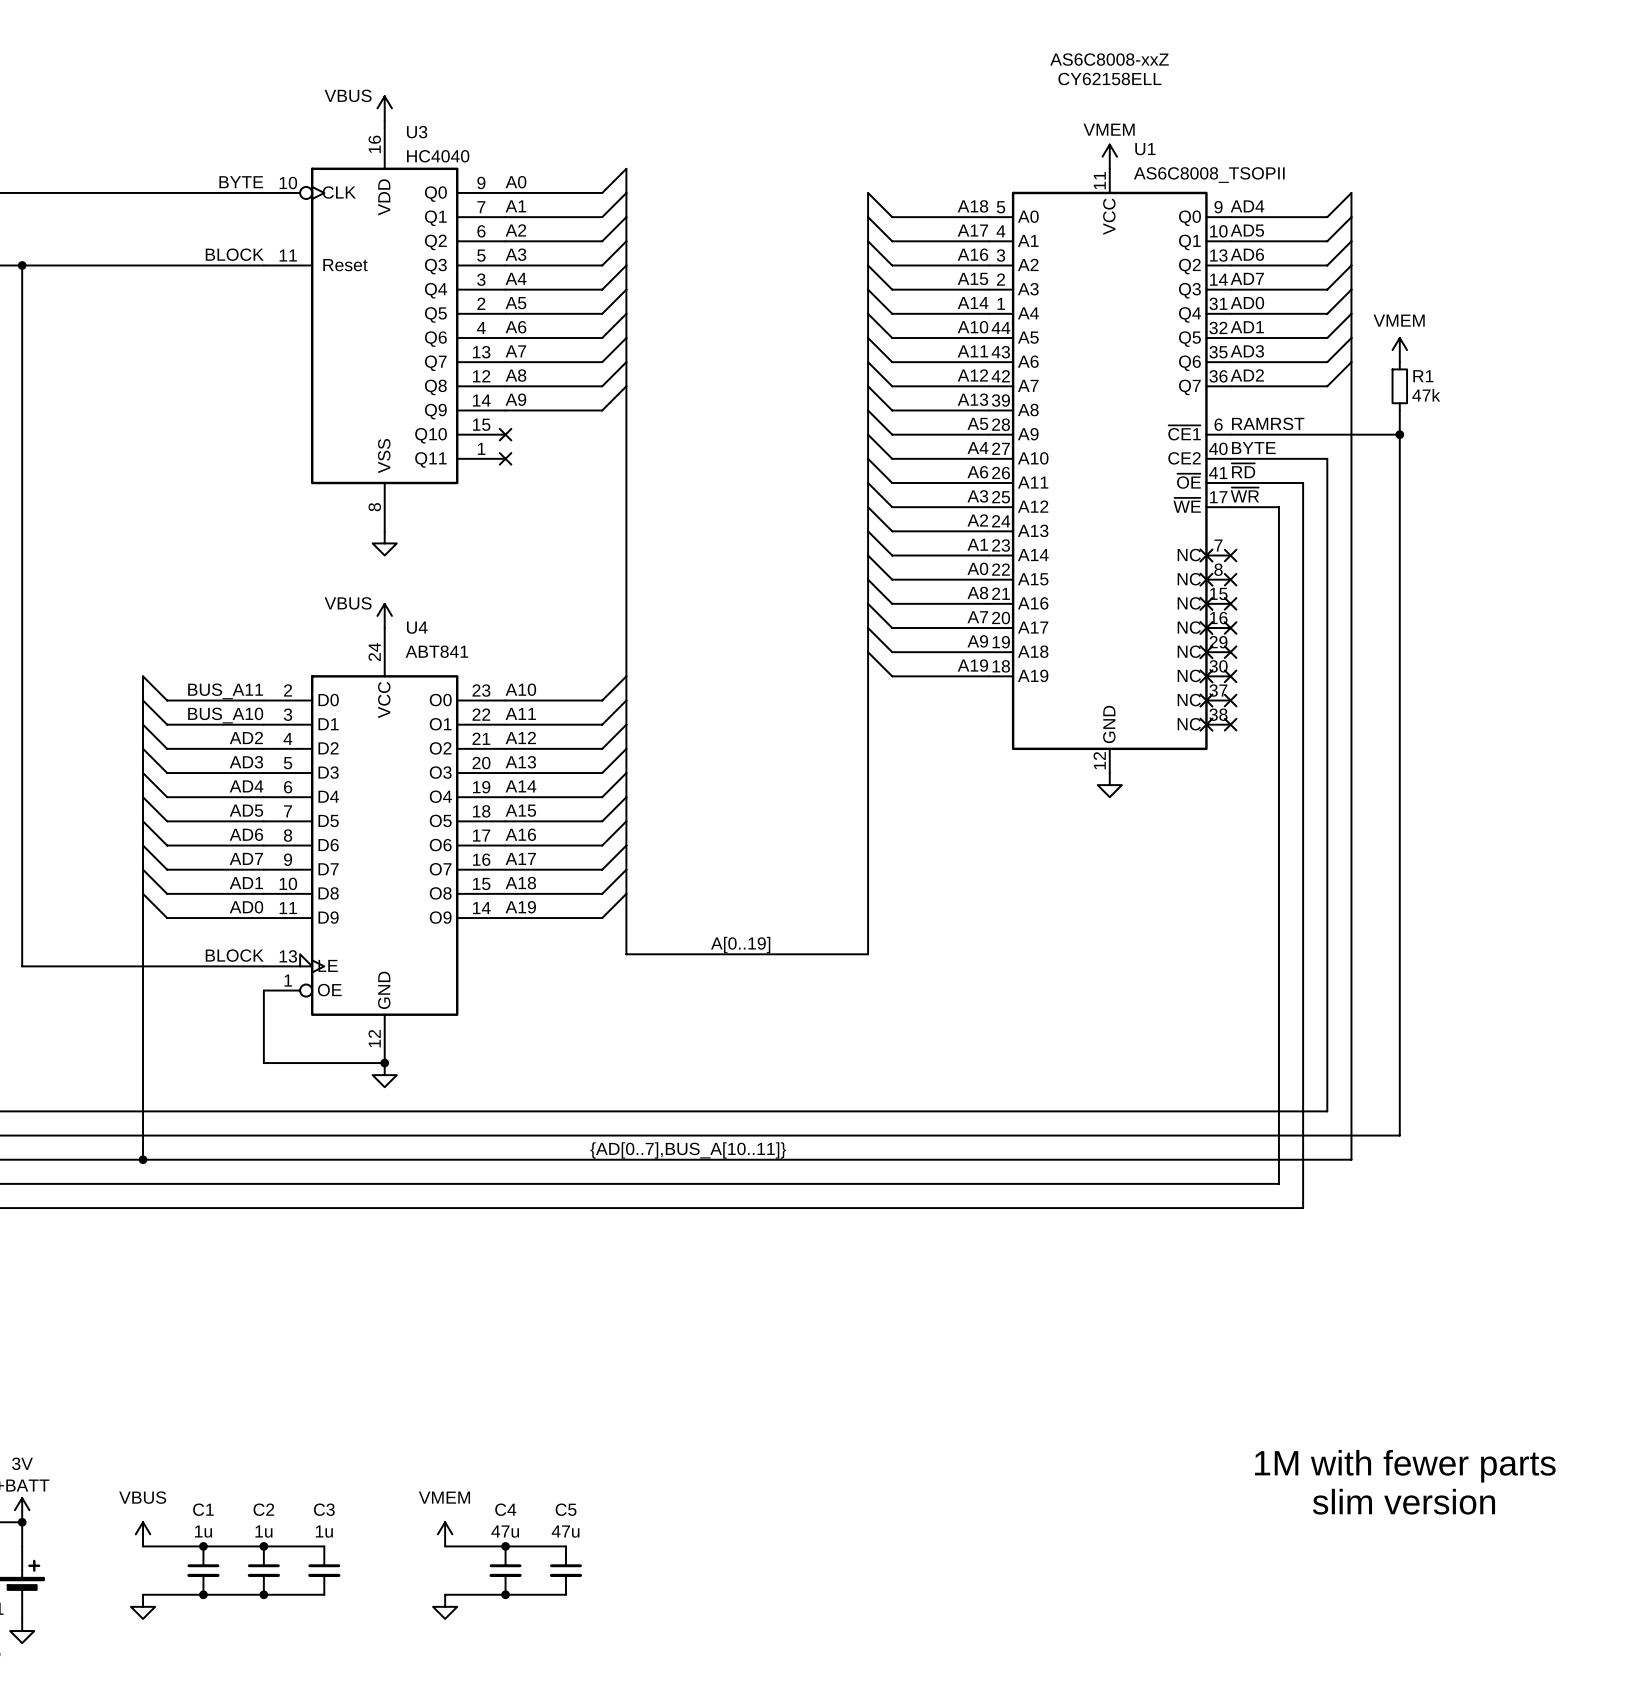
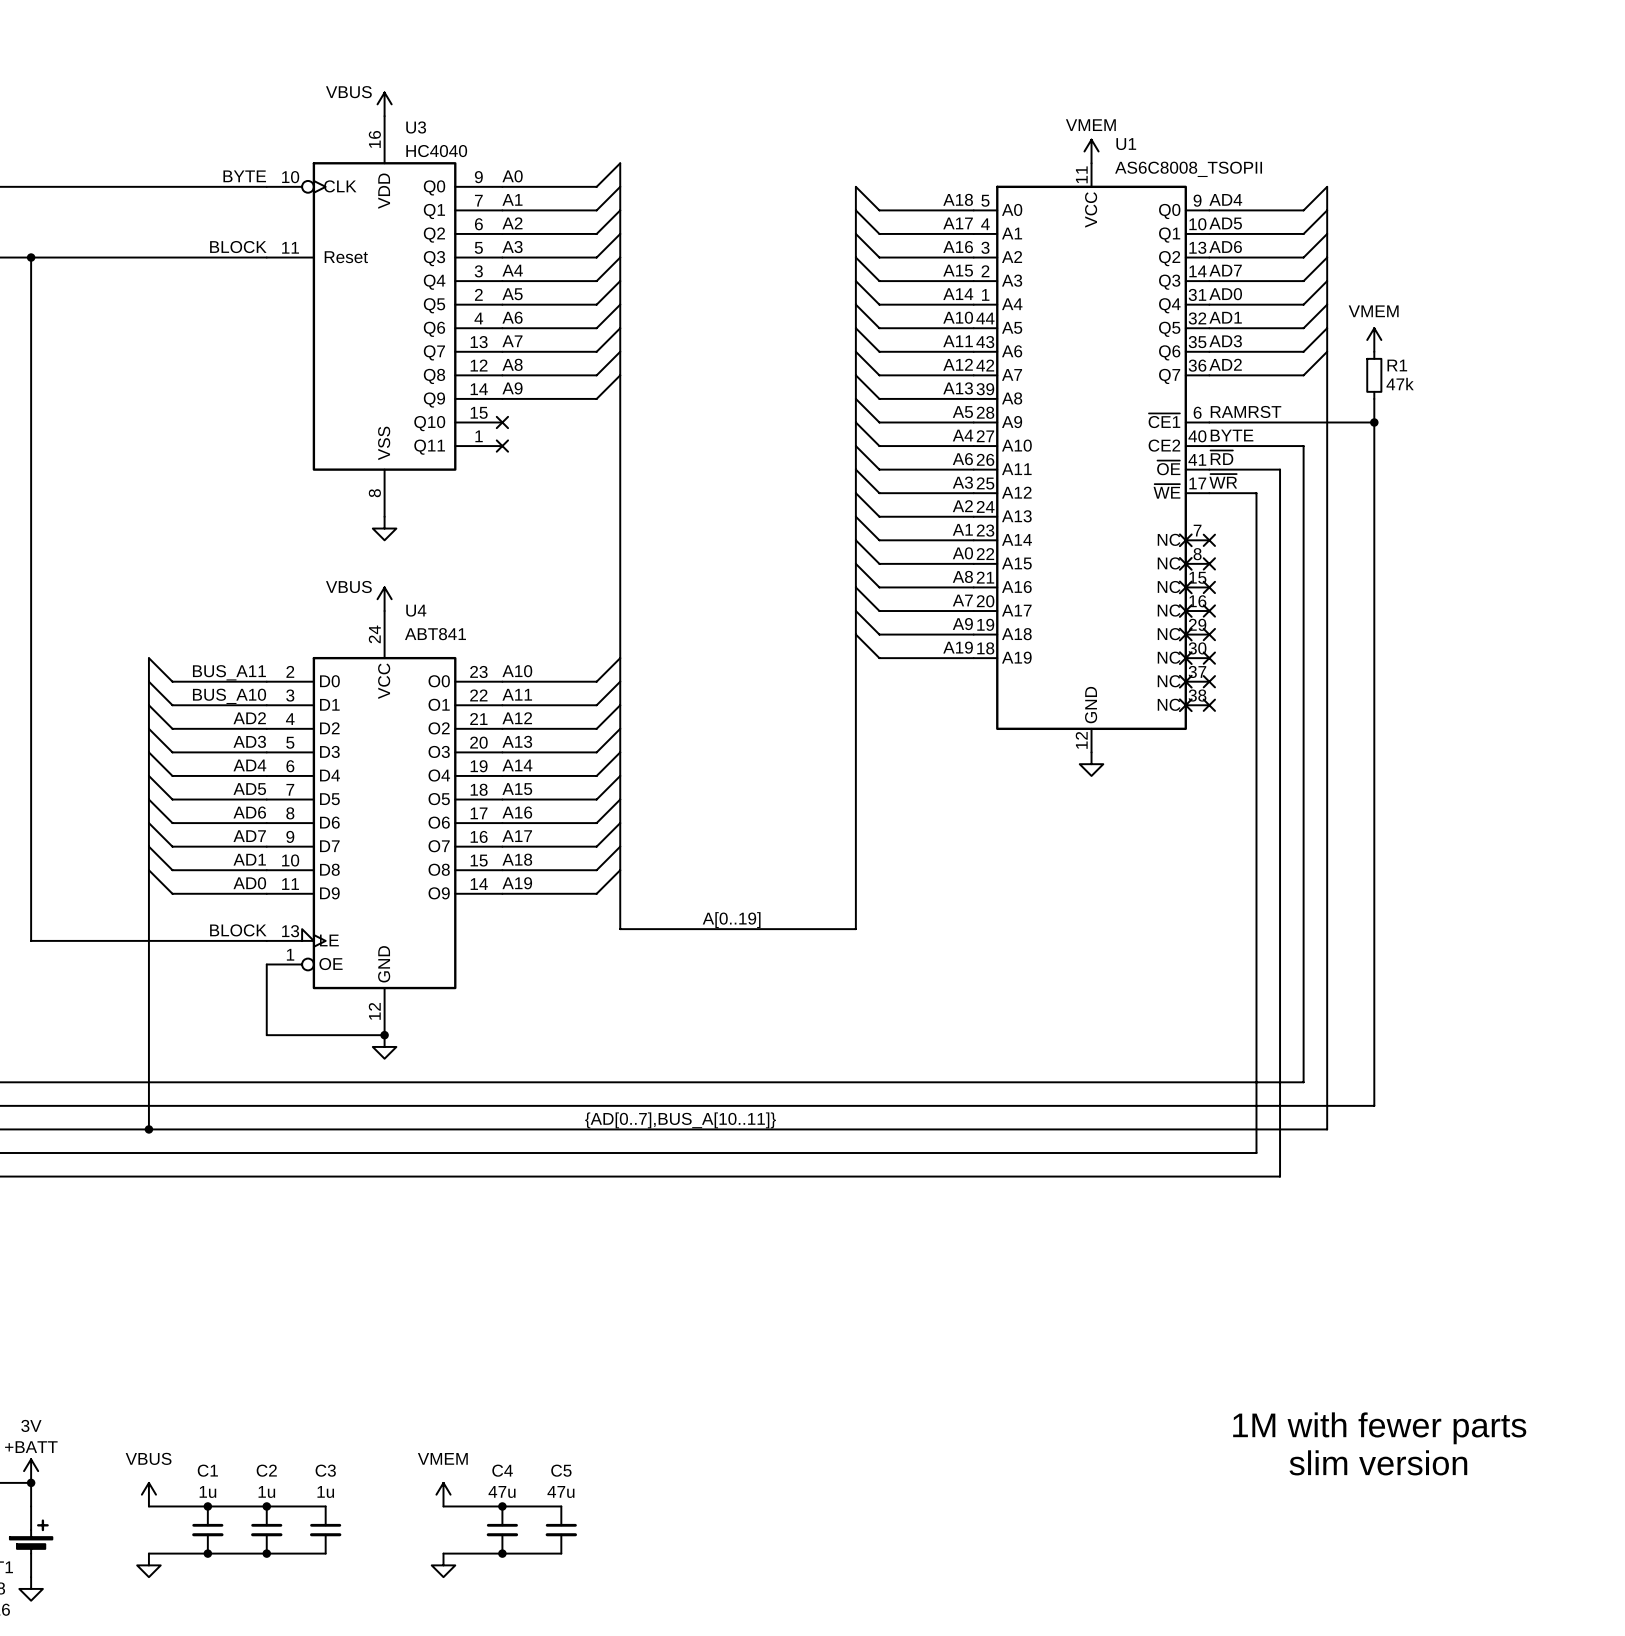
text: AS6C8008-xxZ (1109, 59) -> none
text: CY62158ELL (1109, 79) -> none

